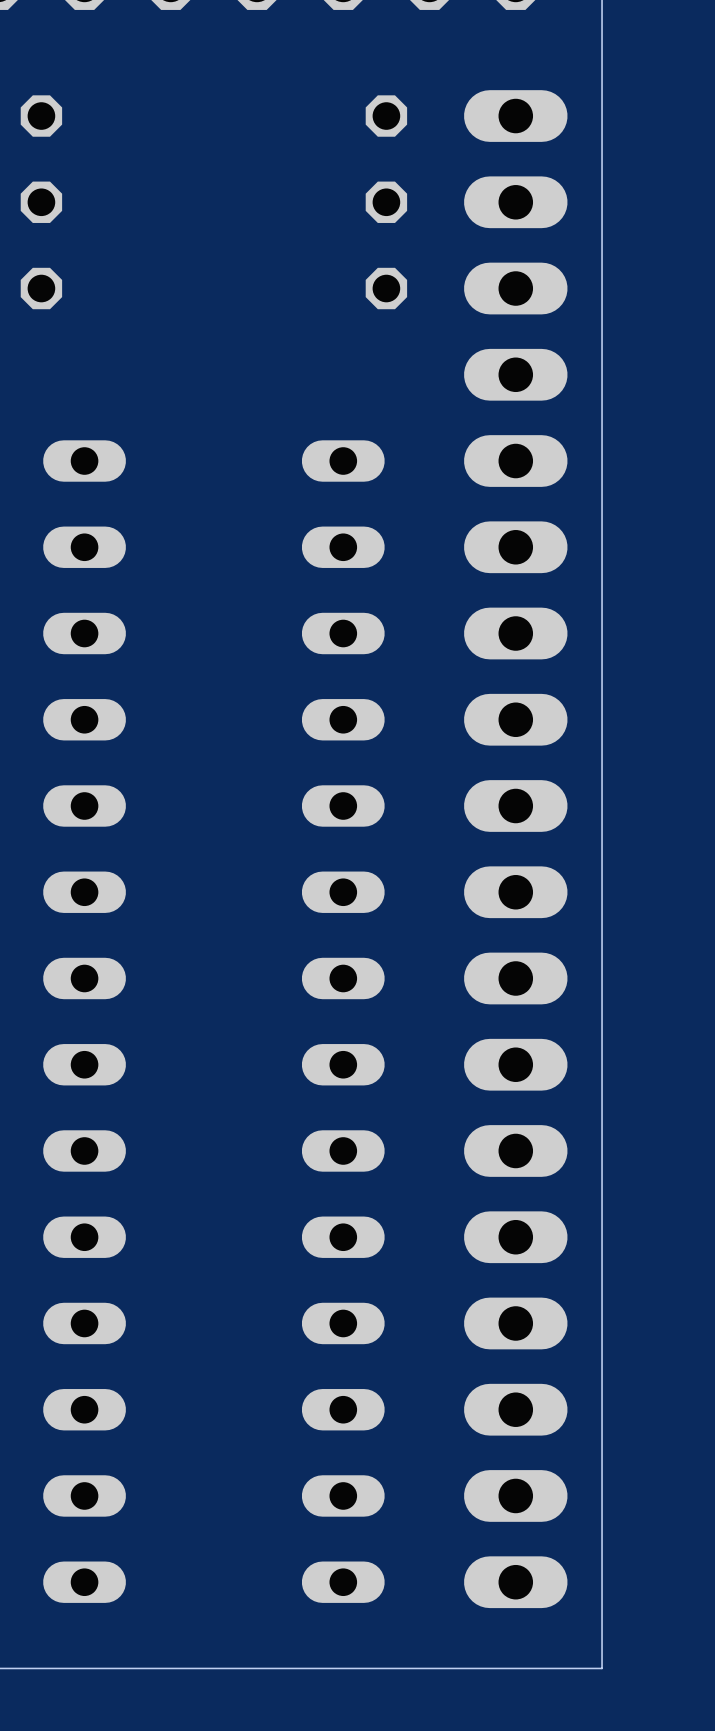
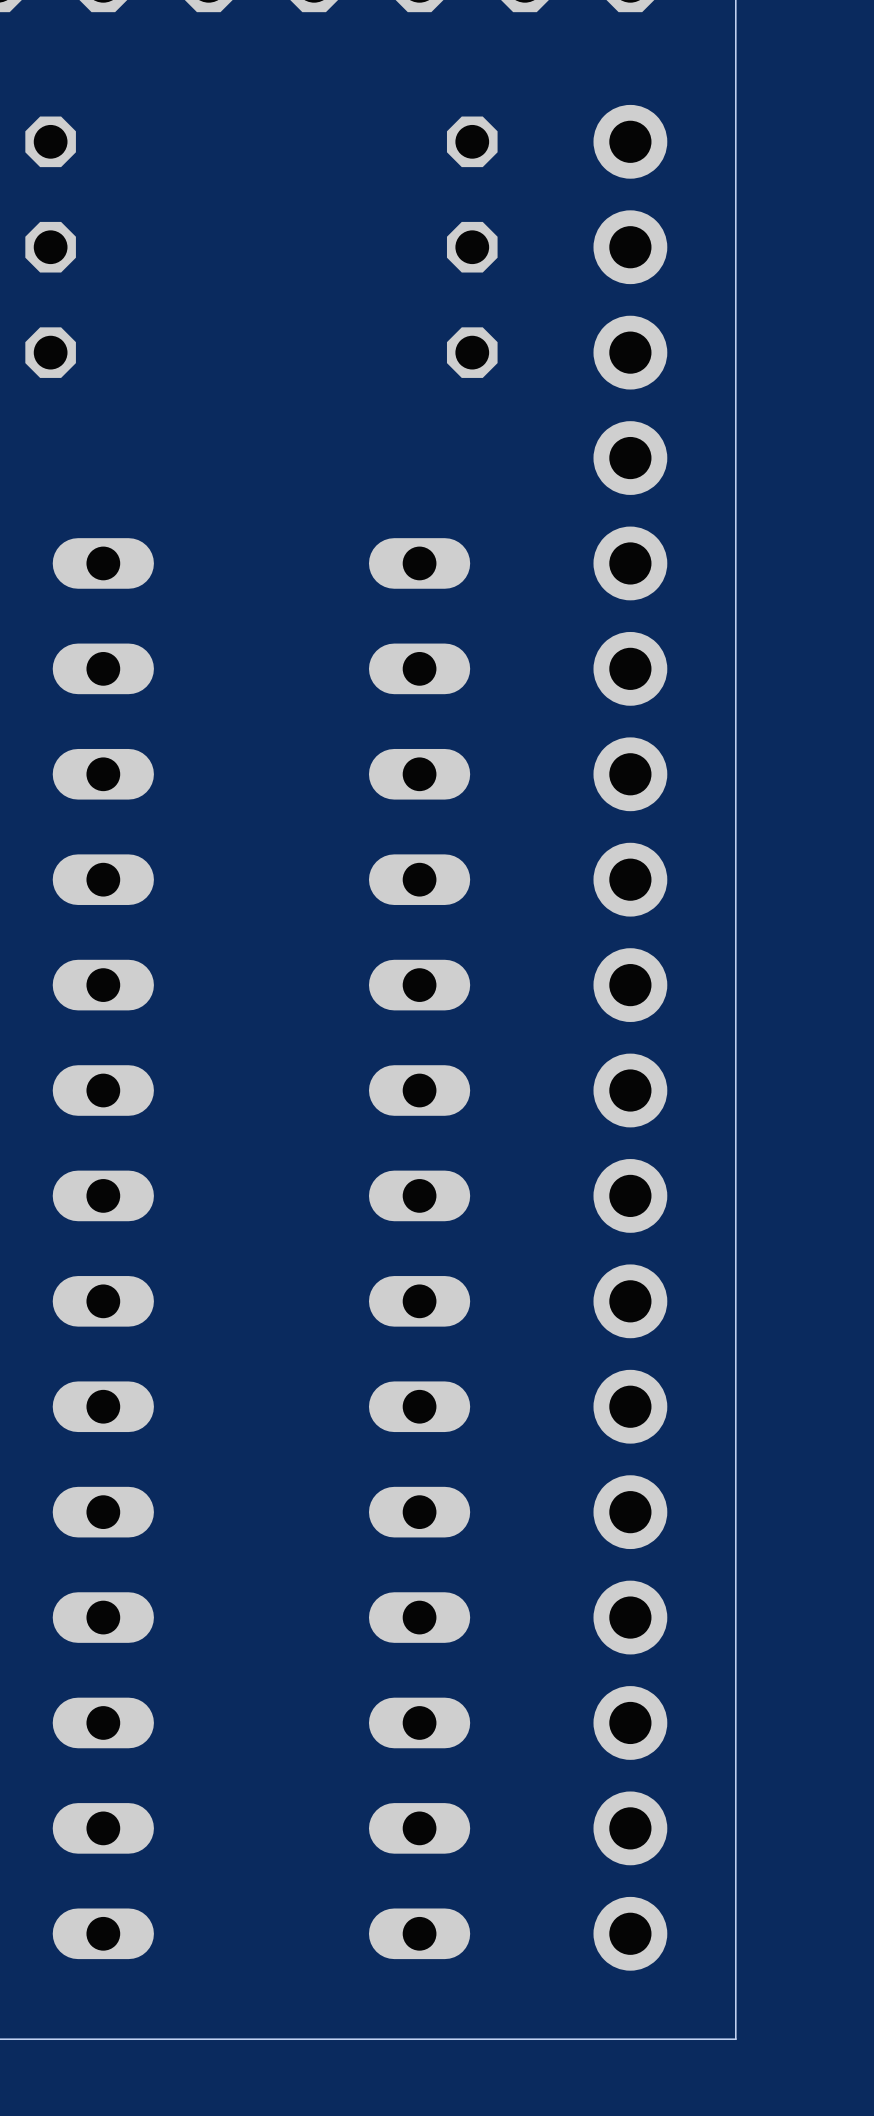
part footprint: [464, 90, 568, 1609] -> [593, 104, 668, 1971]

